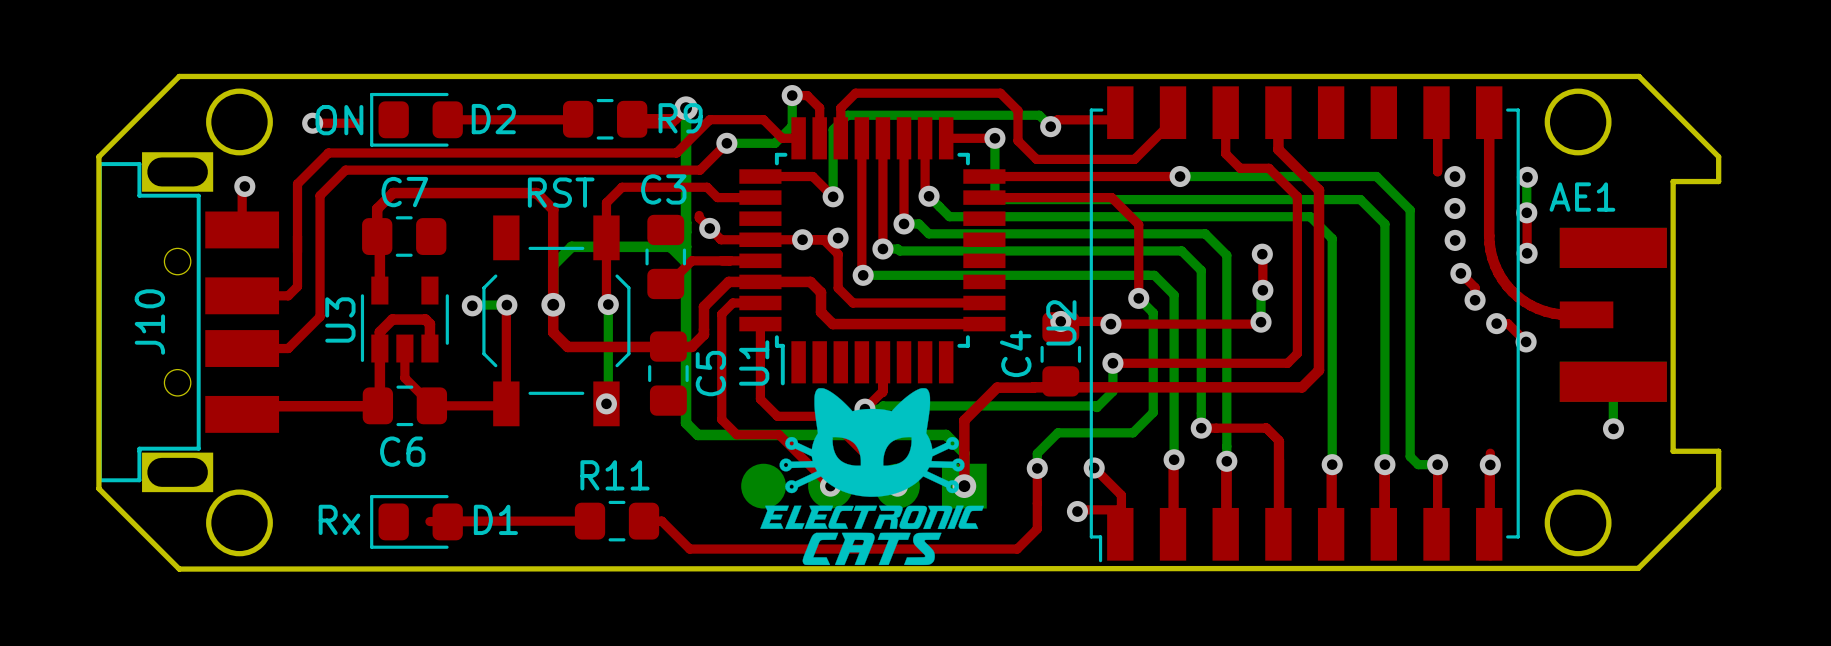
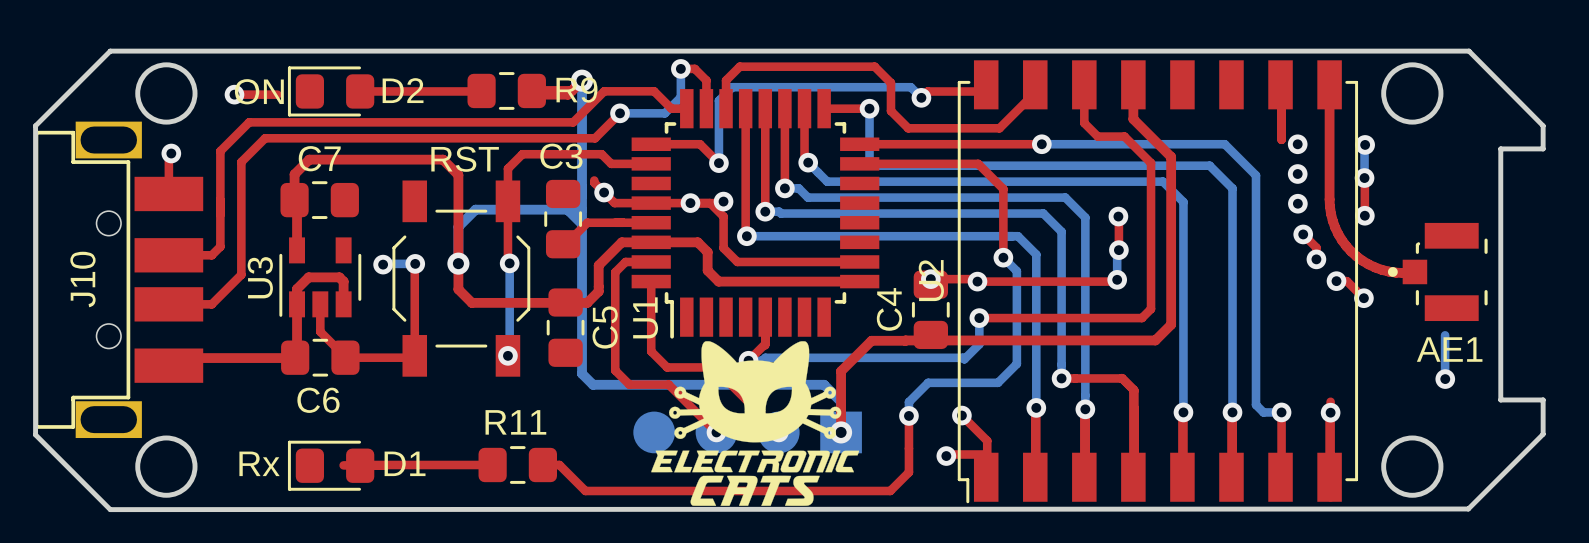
AE1 name position: AE1 (1582, 197) -> AE1 (1449, 349)
AE1 footprint: [1559, 227, 1667, 402] -> [1387, 222, 1488, 322]

